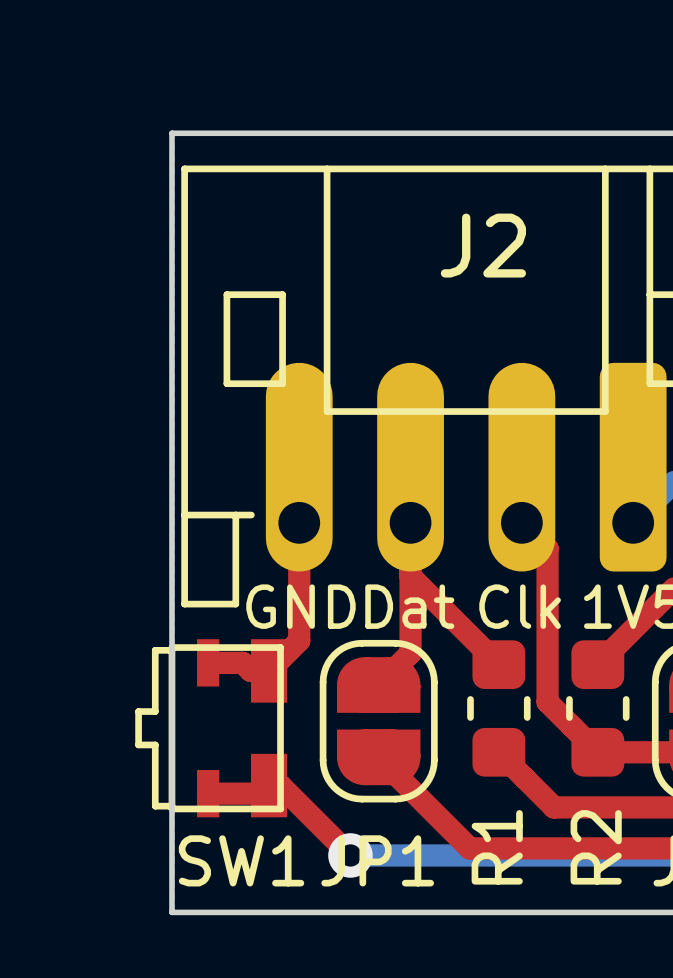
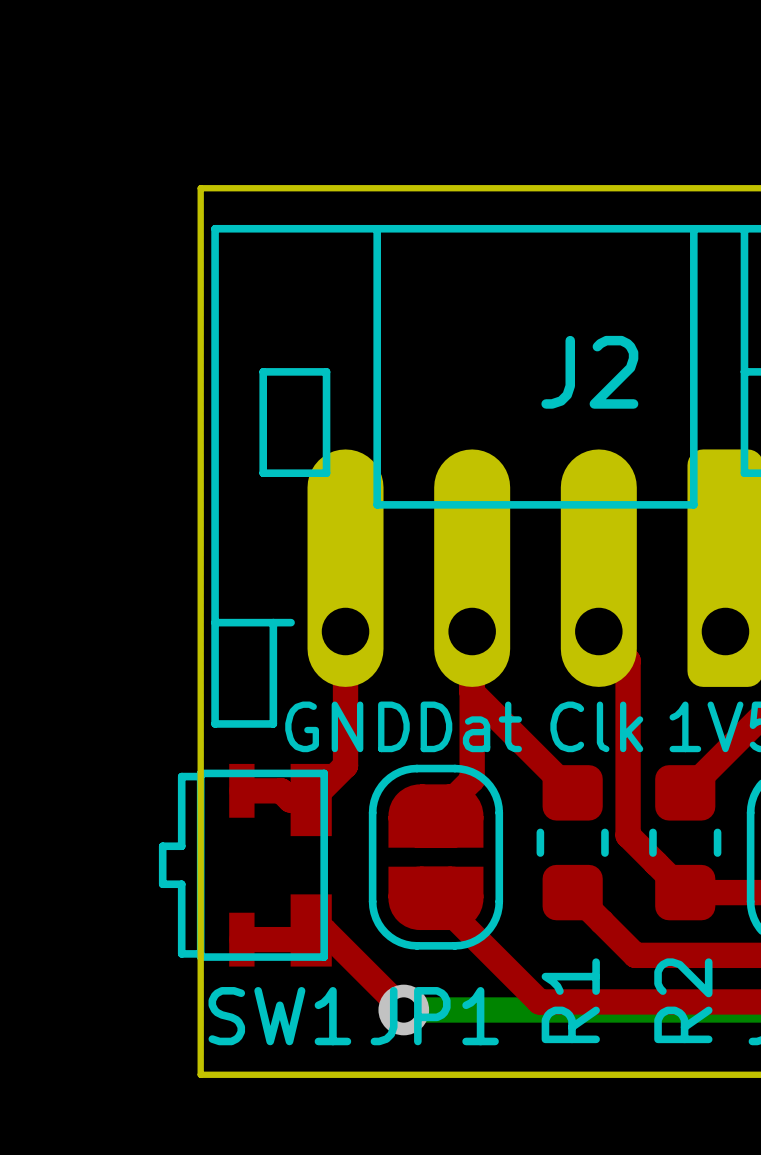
J2 name position: J2 (483, 245) -> J2 (589, 372)

